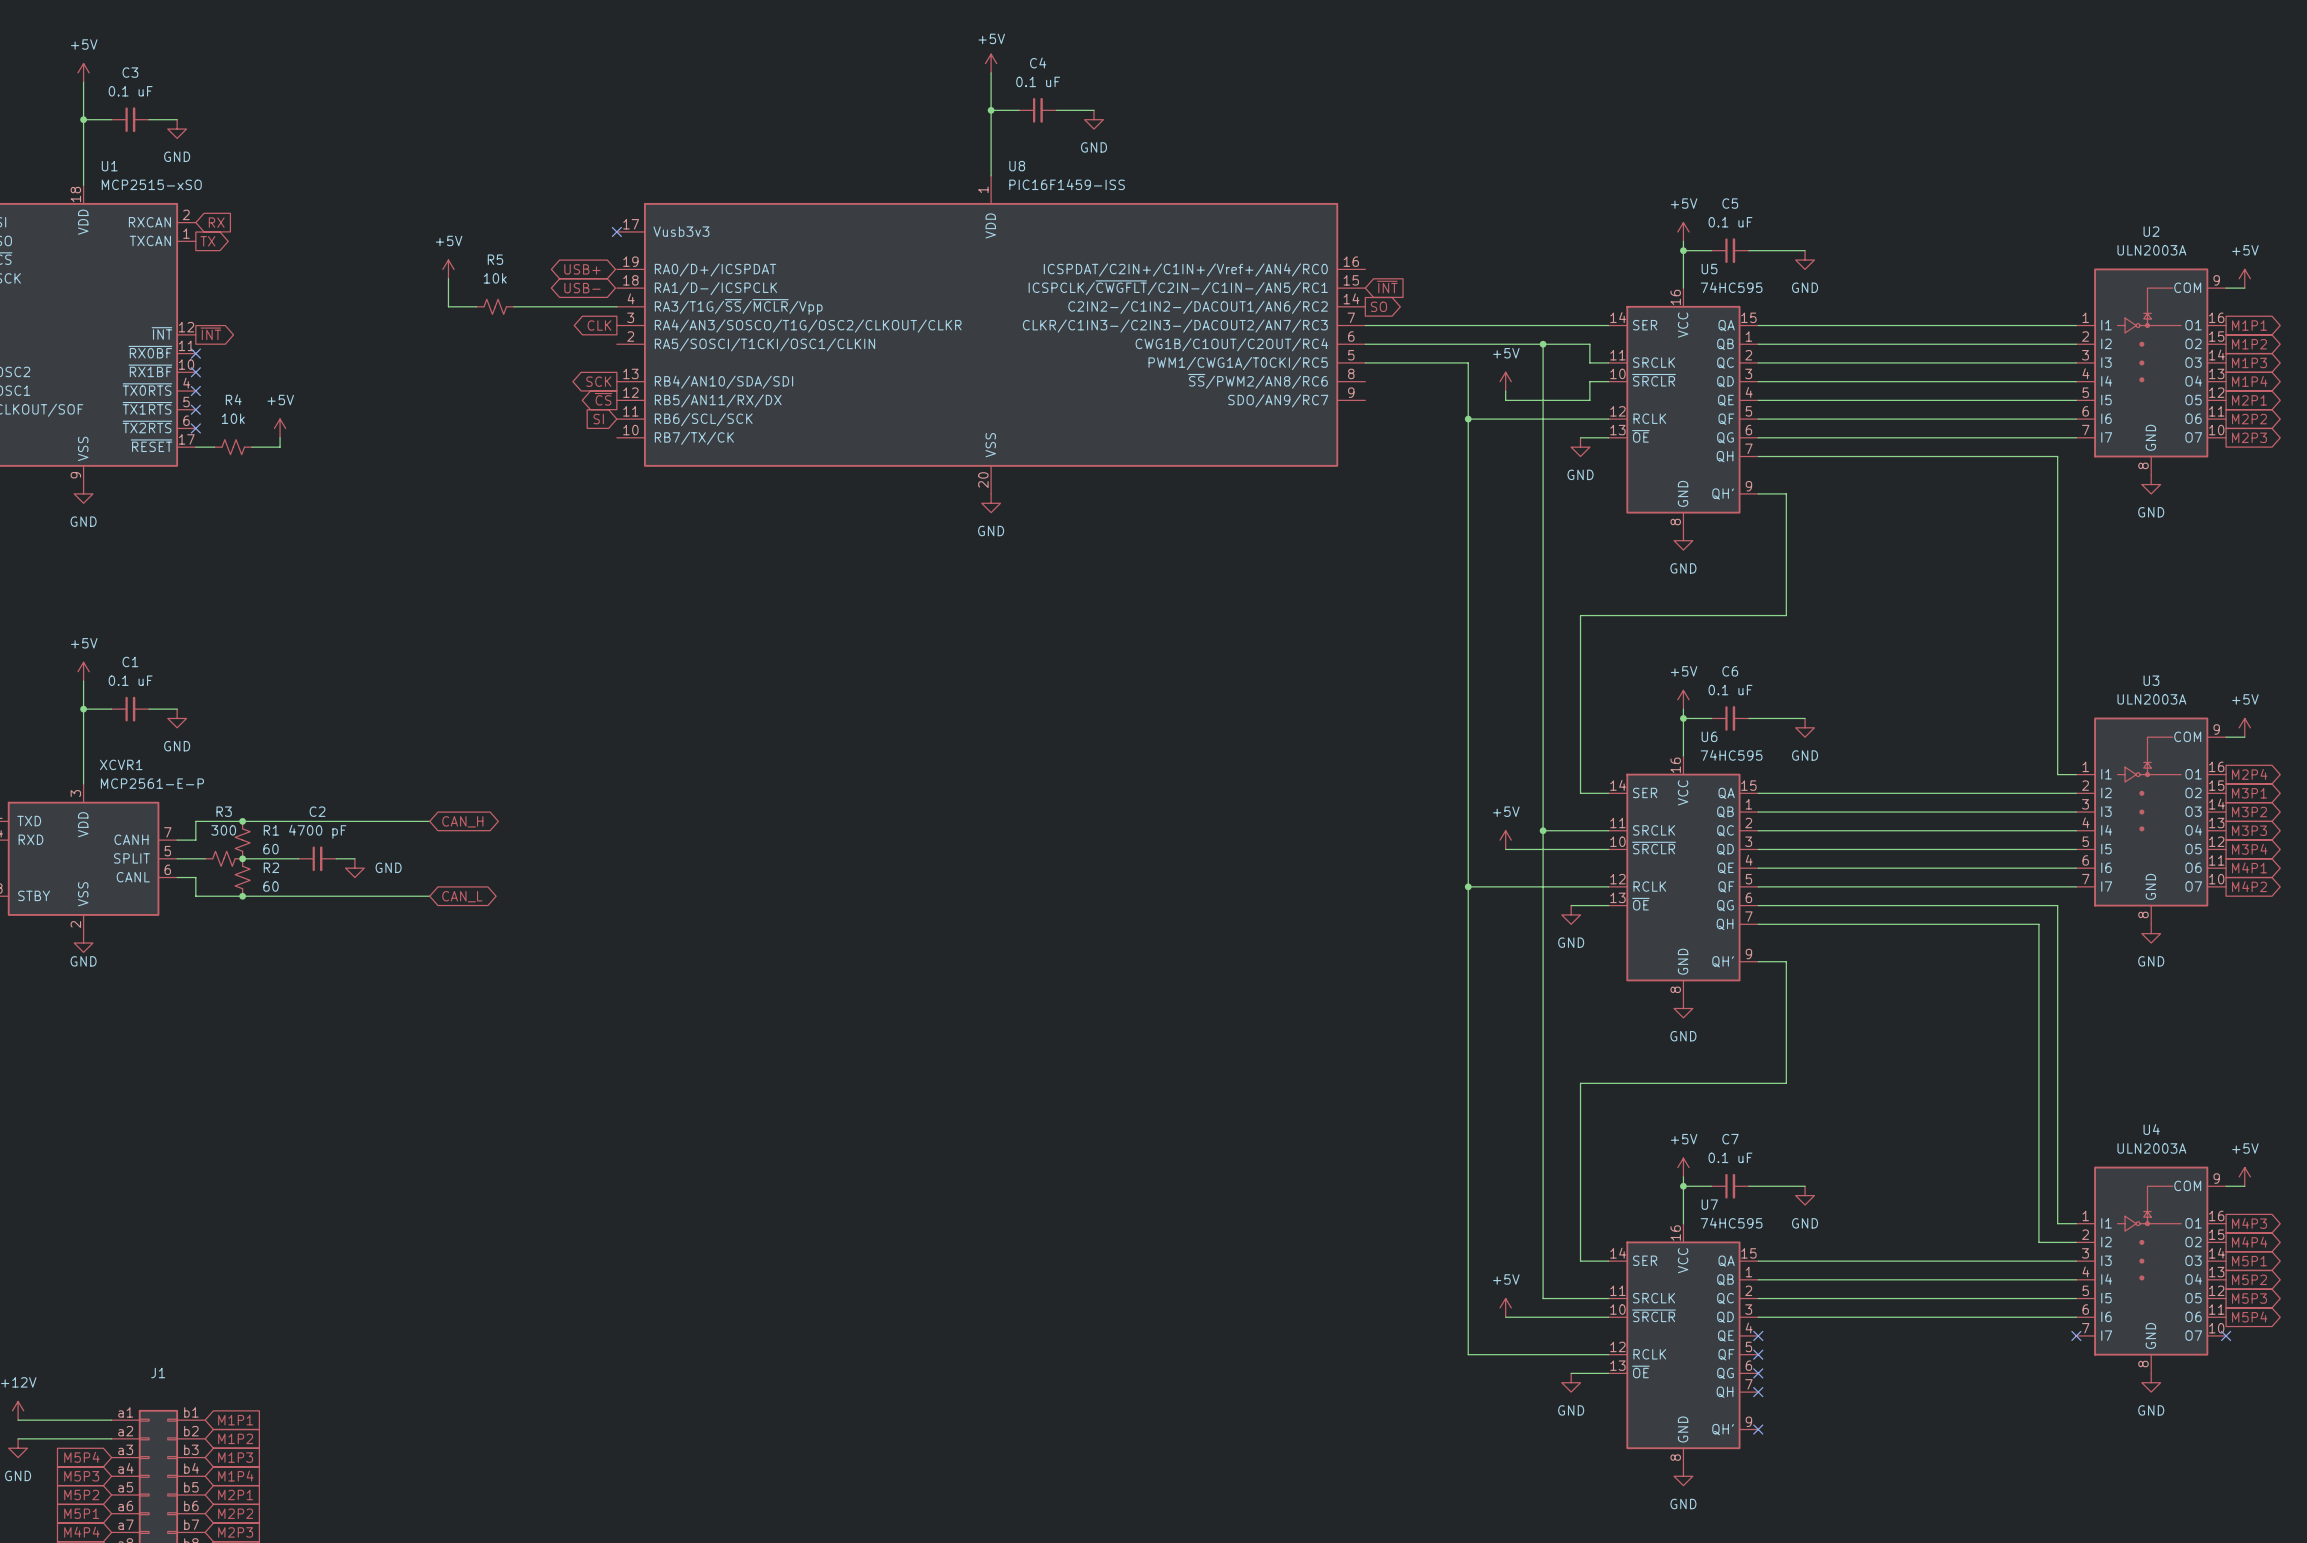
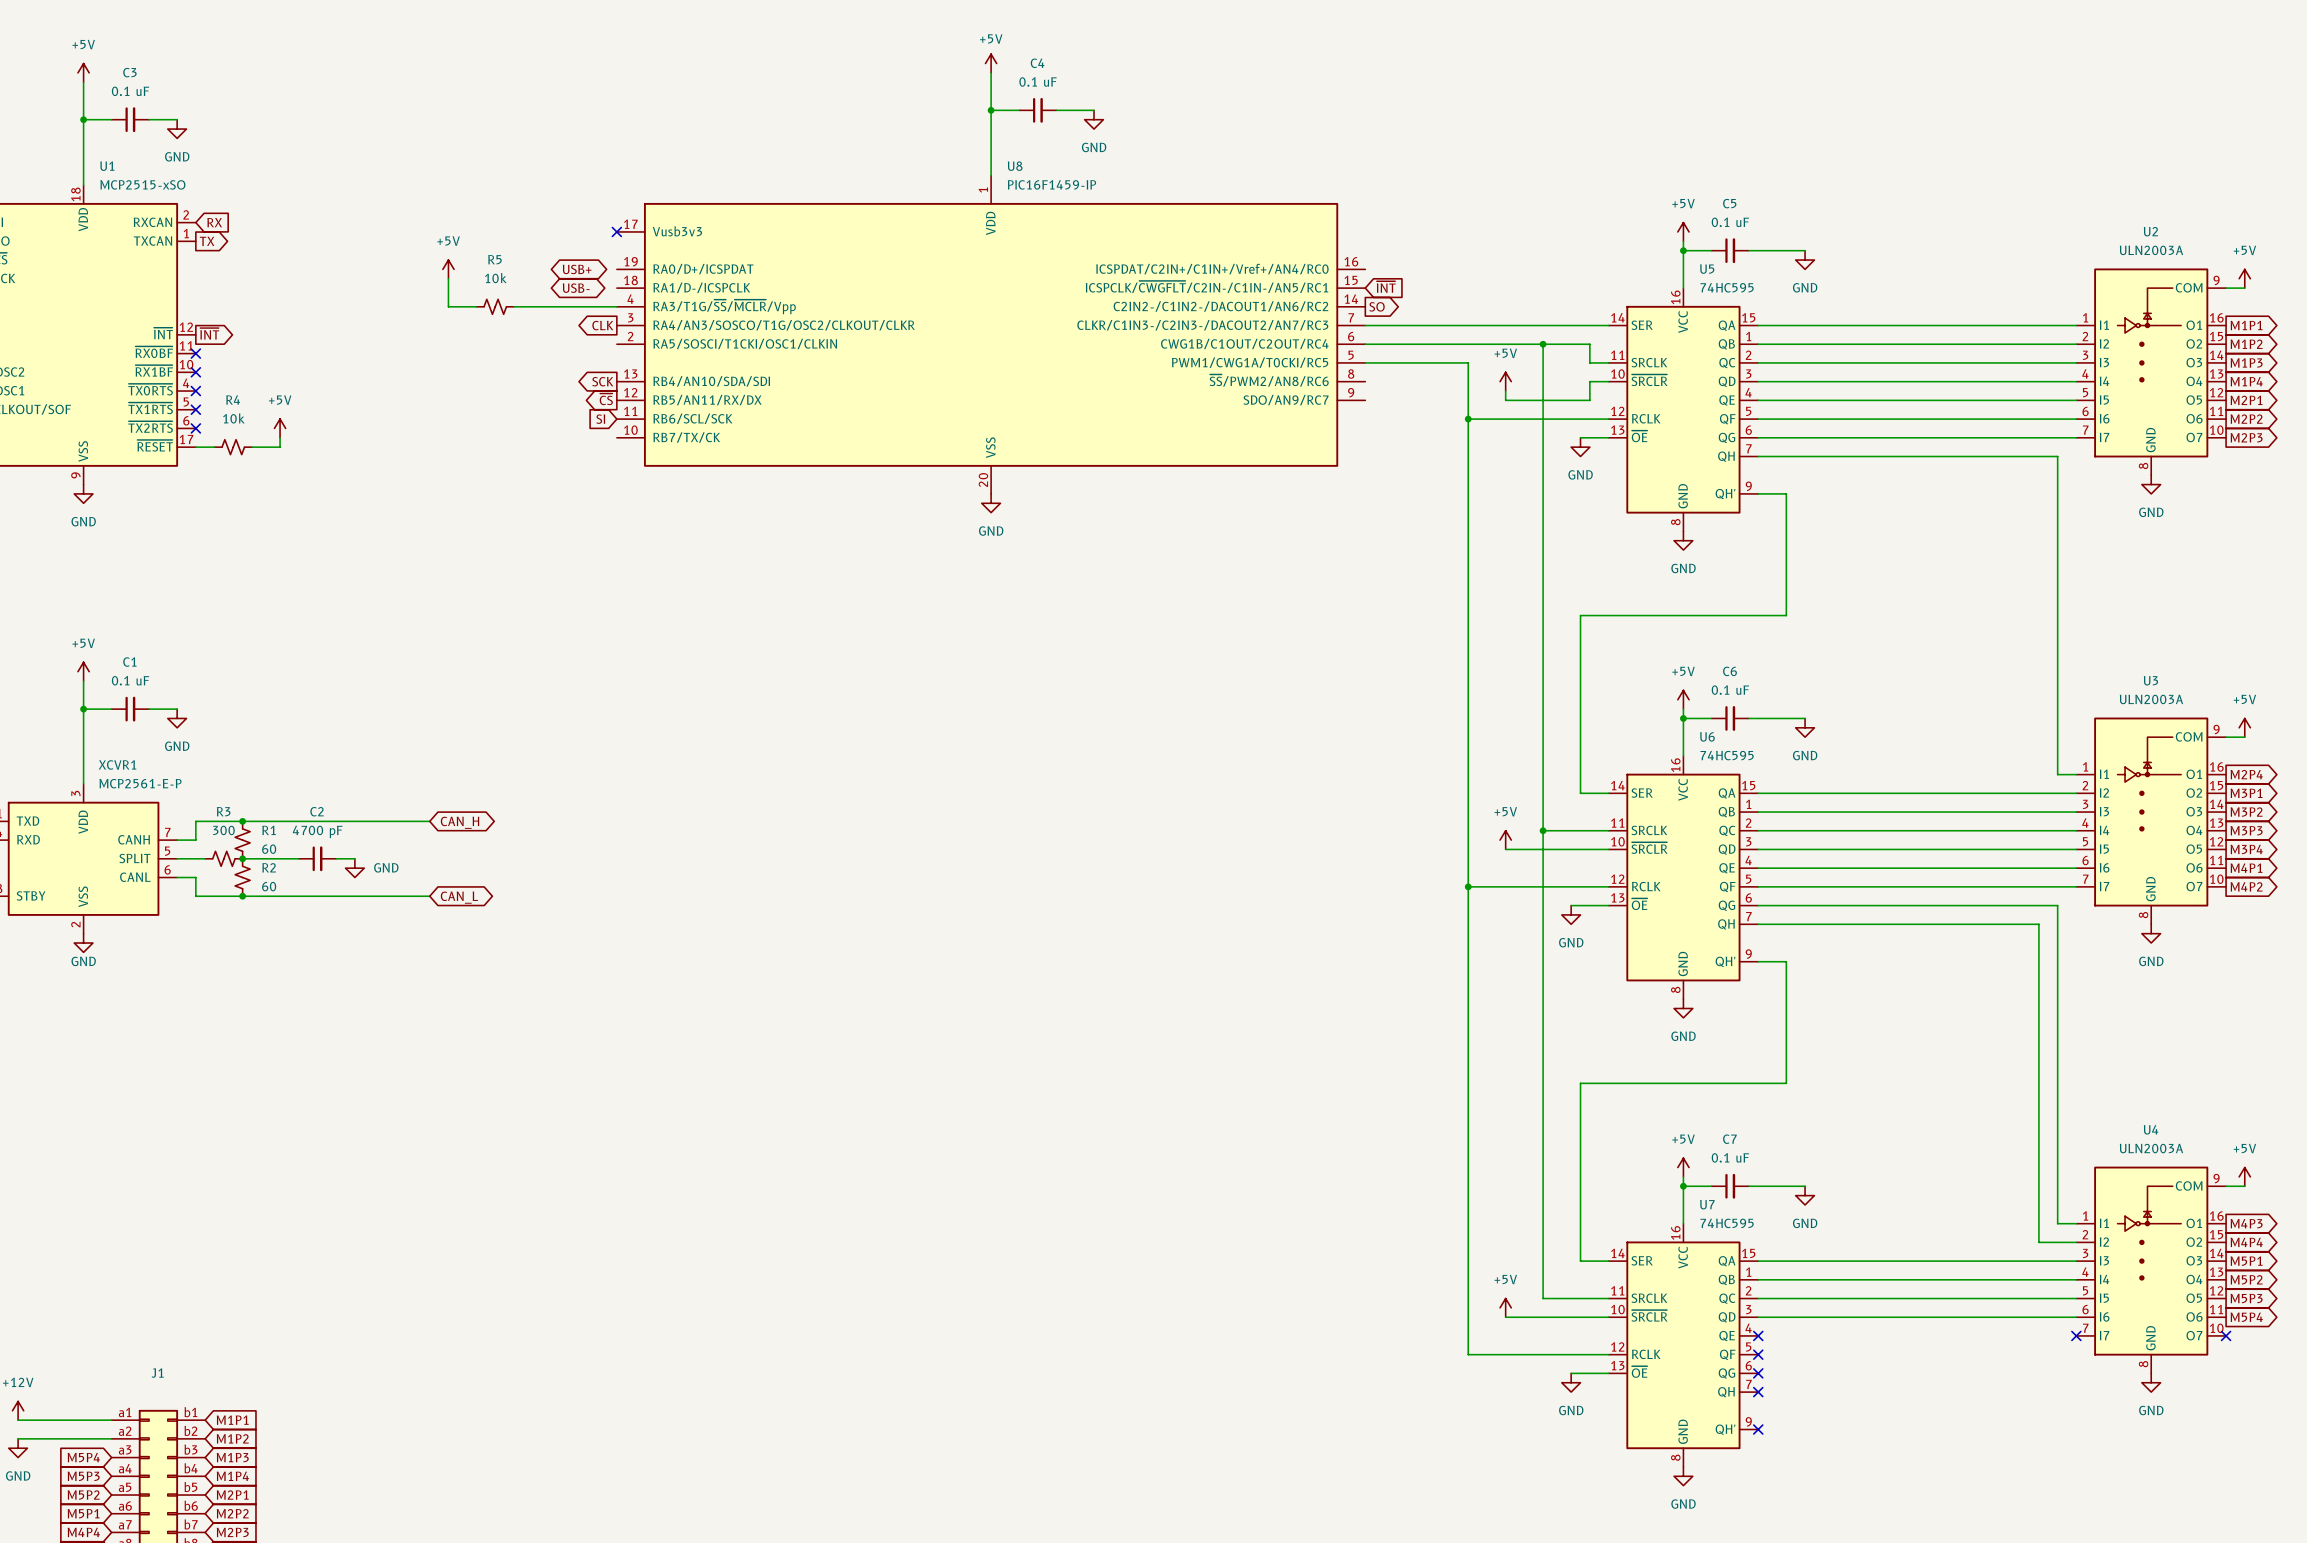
U8 value: PIC16F1459-ISS (1067, 184) -> PIC16F1459-IP (1051, 184)

